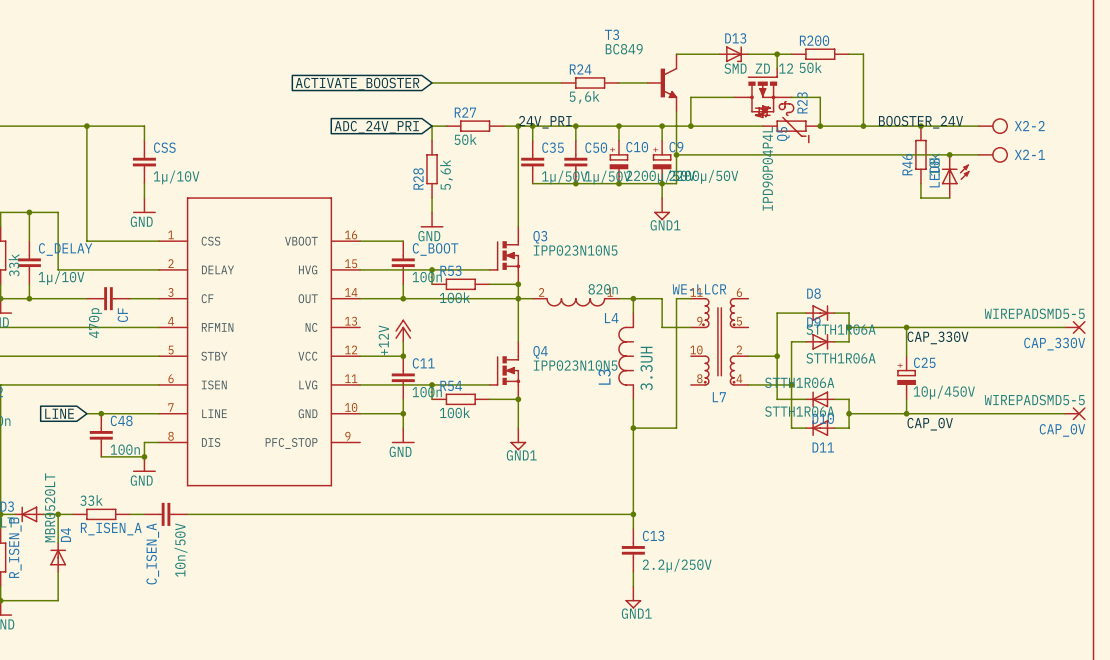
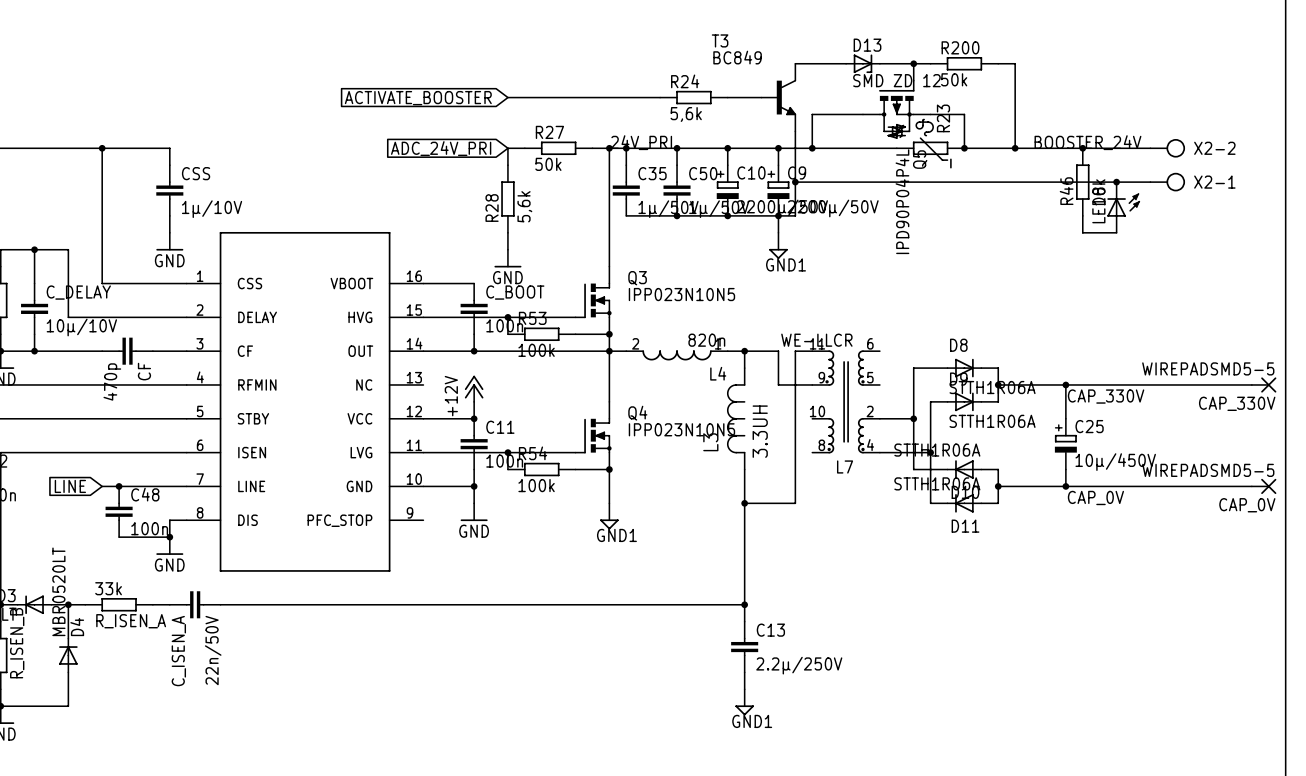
part value: 33k (14, 265) -> none
C_DELAY value: 1µ/10V (61, 278) -> 10µ/10V (81, 327)
C_ISEN_A value: 10n/50V (180, 550) -> 22n/50V (213, 650)

